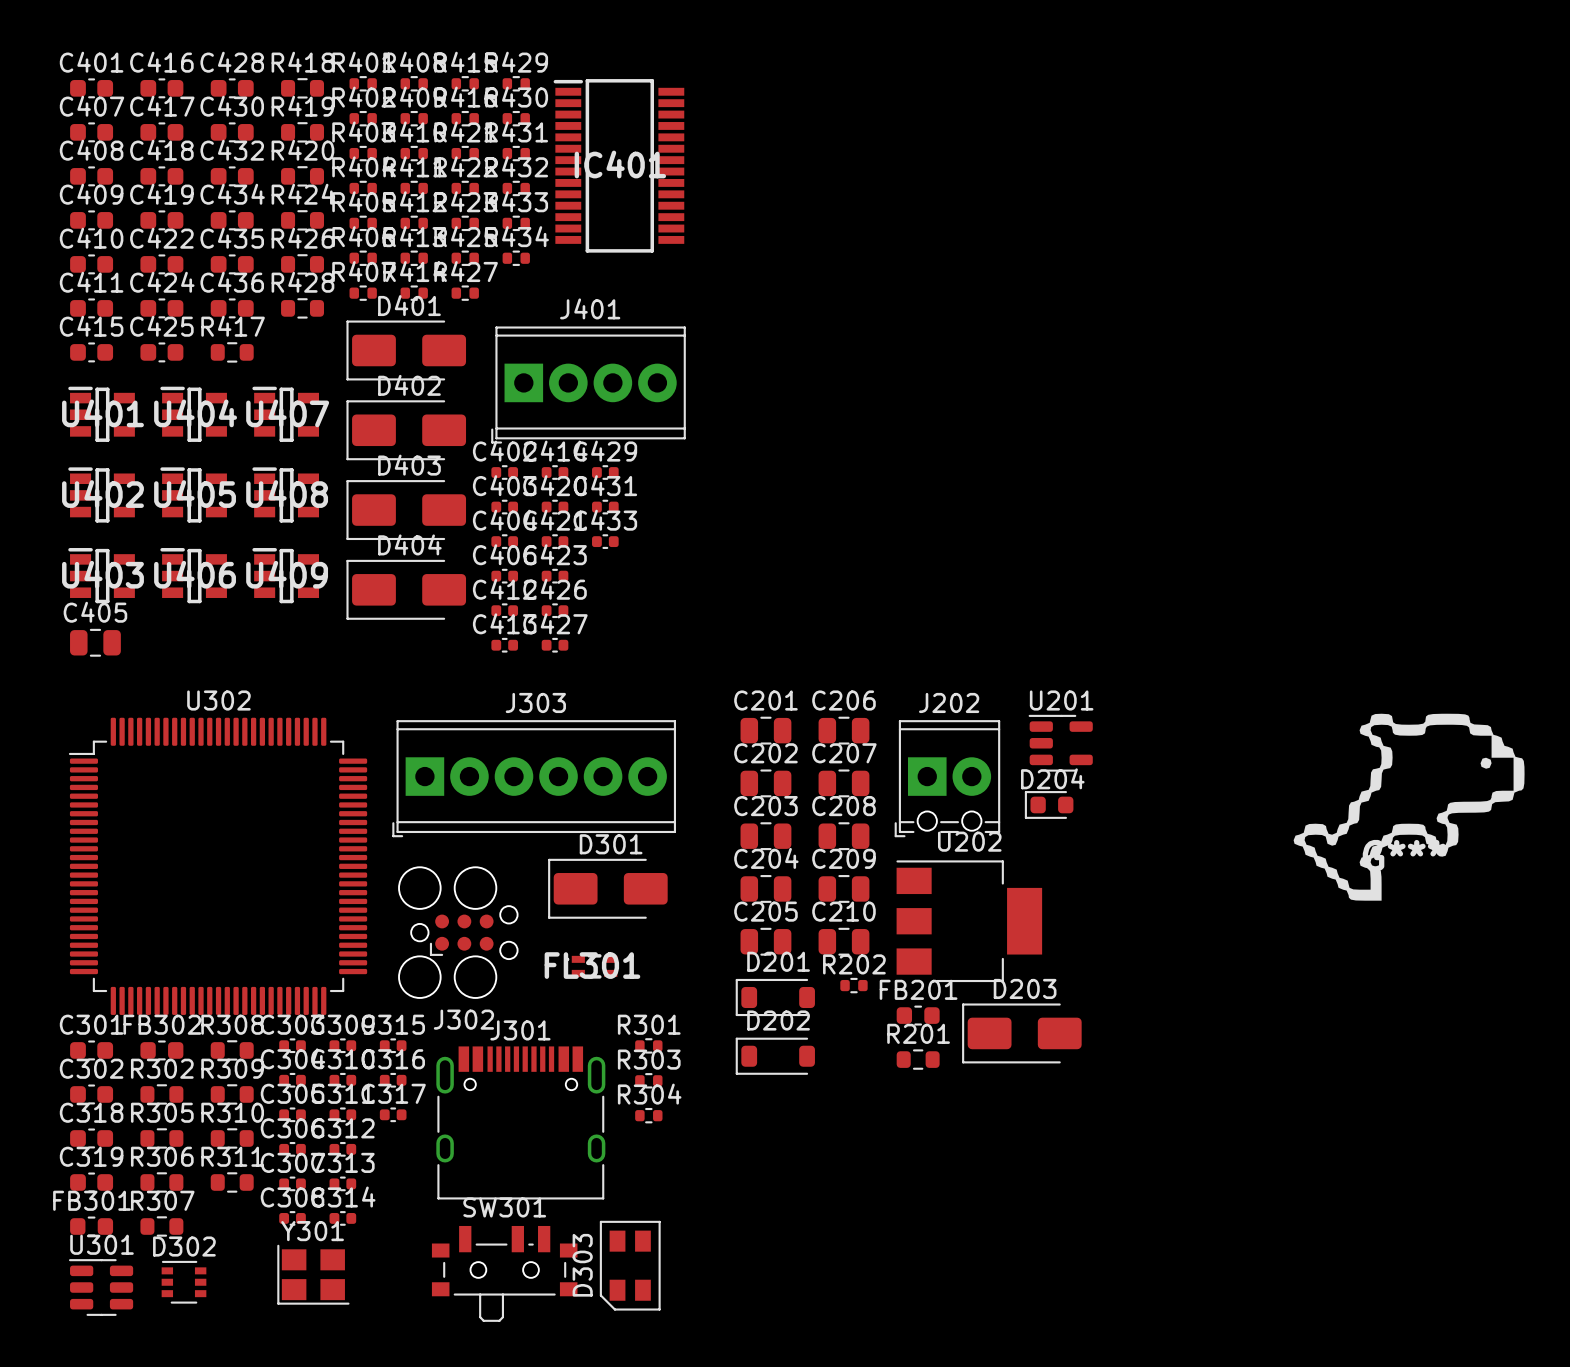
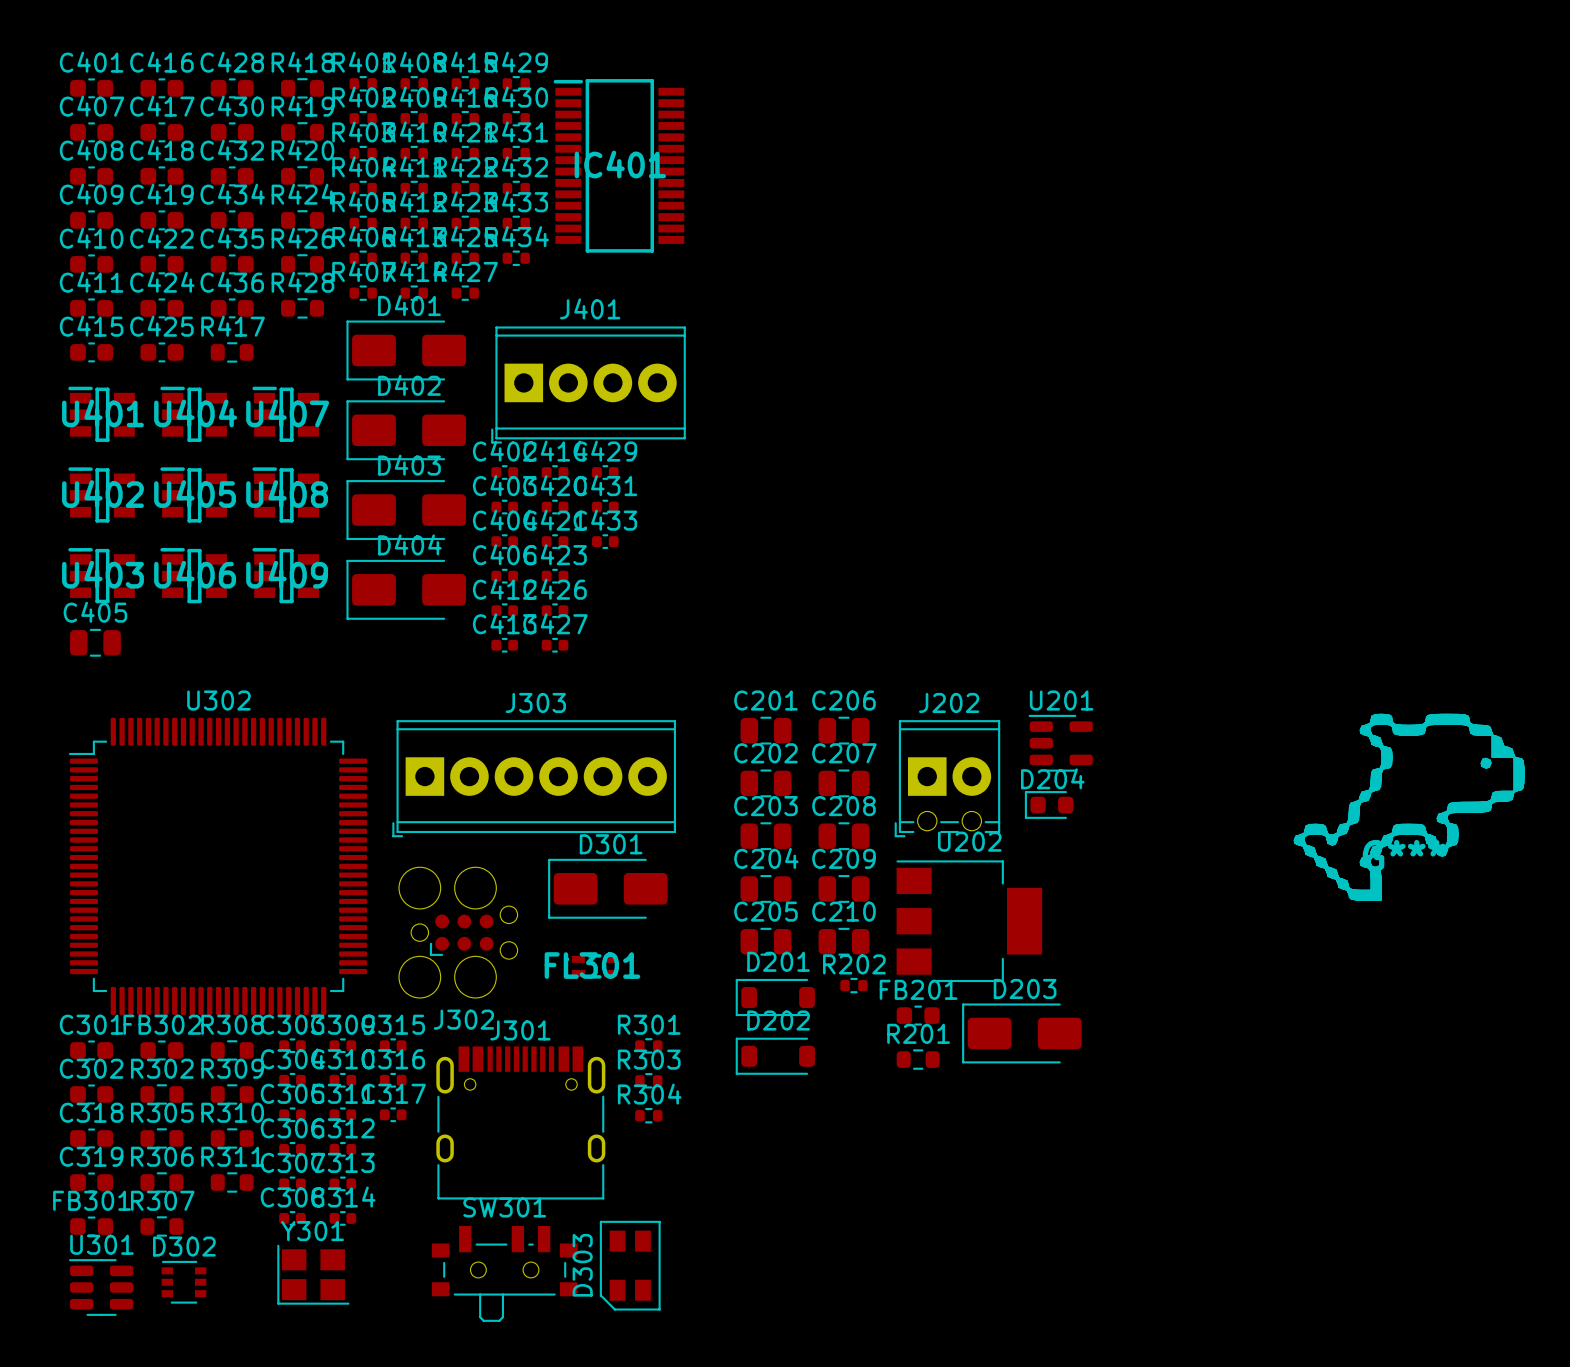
drawing: none -> [1293, 713, 1525, 901]

